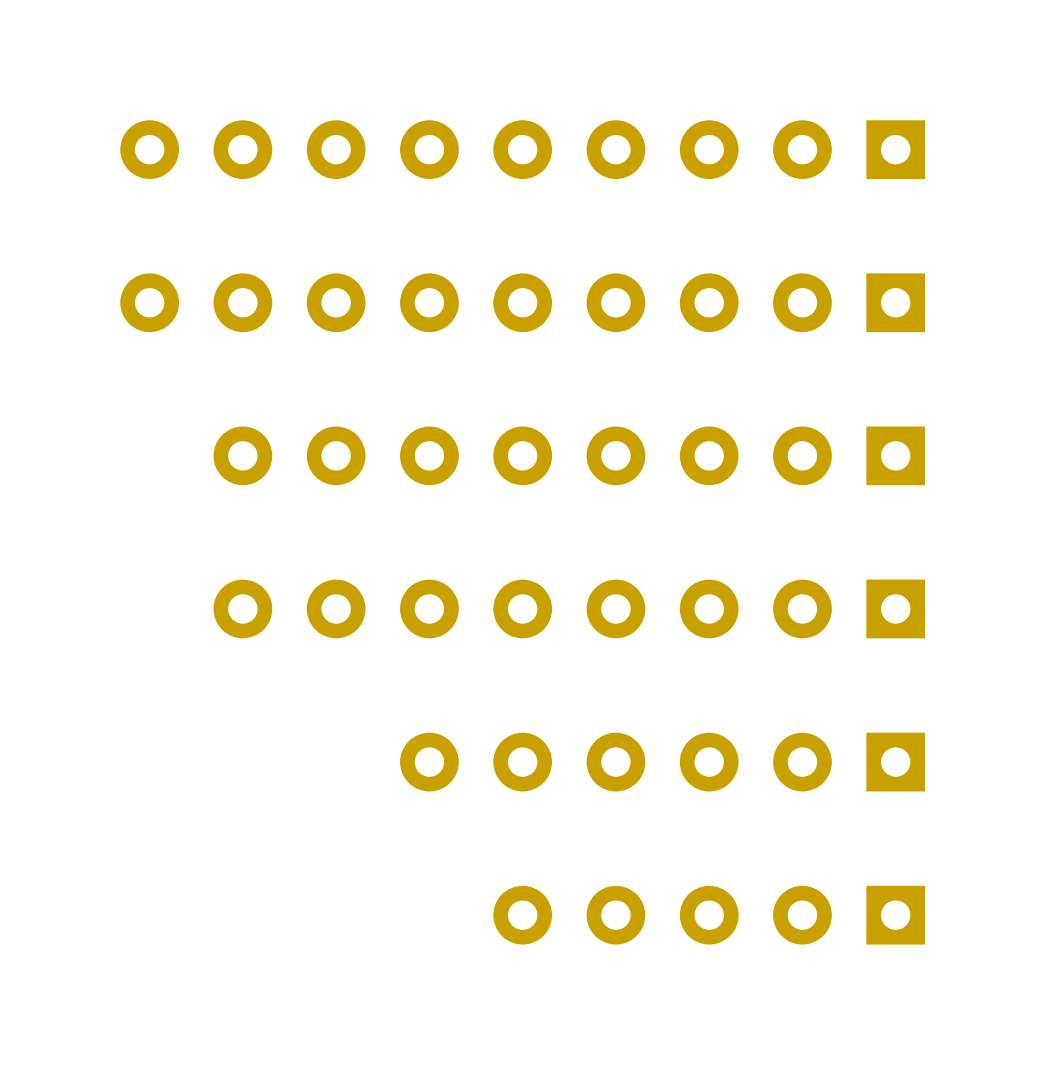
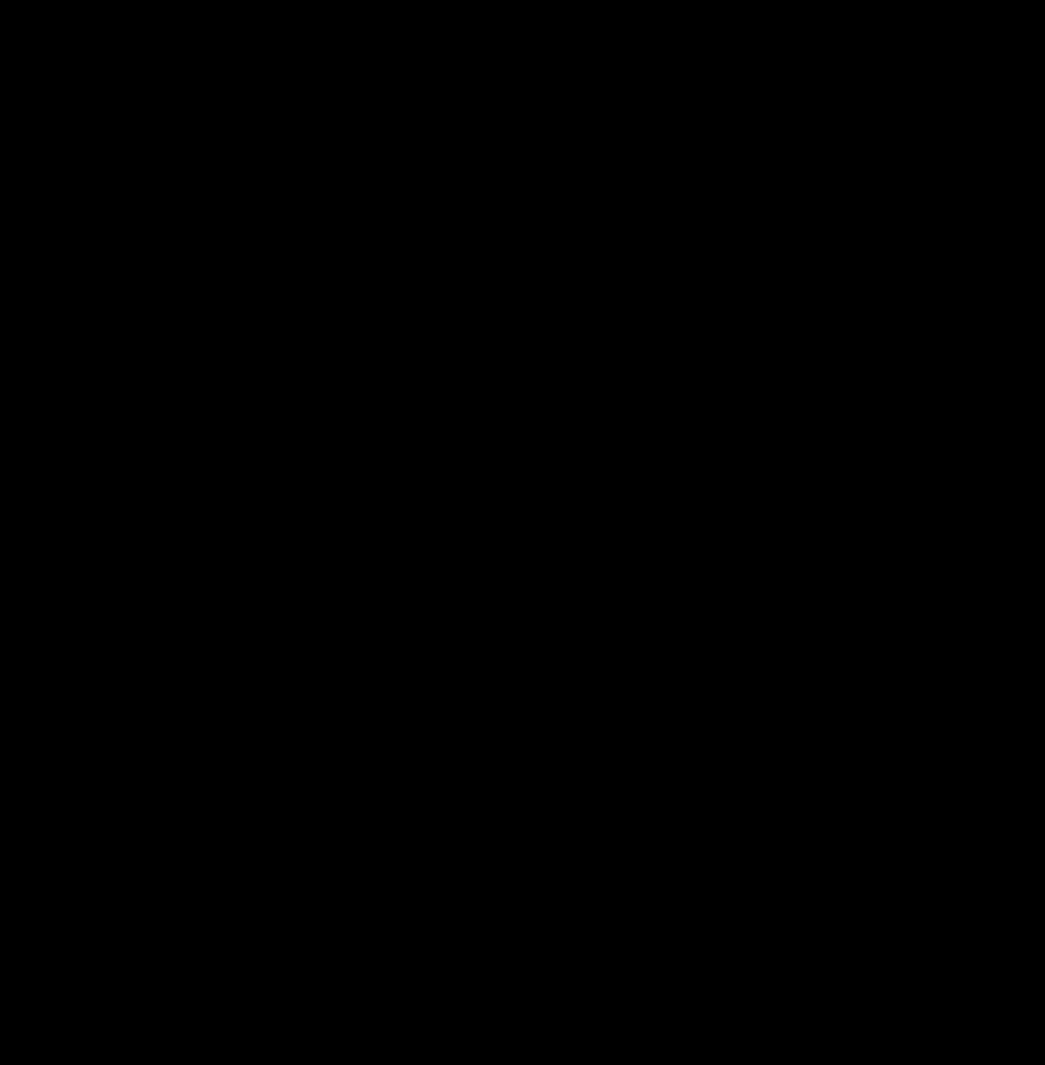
part: (522, 149) -> none
part: (522, 302) -> none
part: (569, 455) -> none
part: (569, 608) -> none
part: (662, 762) -> none
part: (709, 915) -> none

